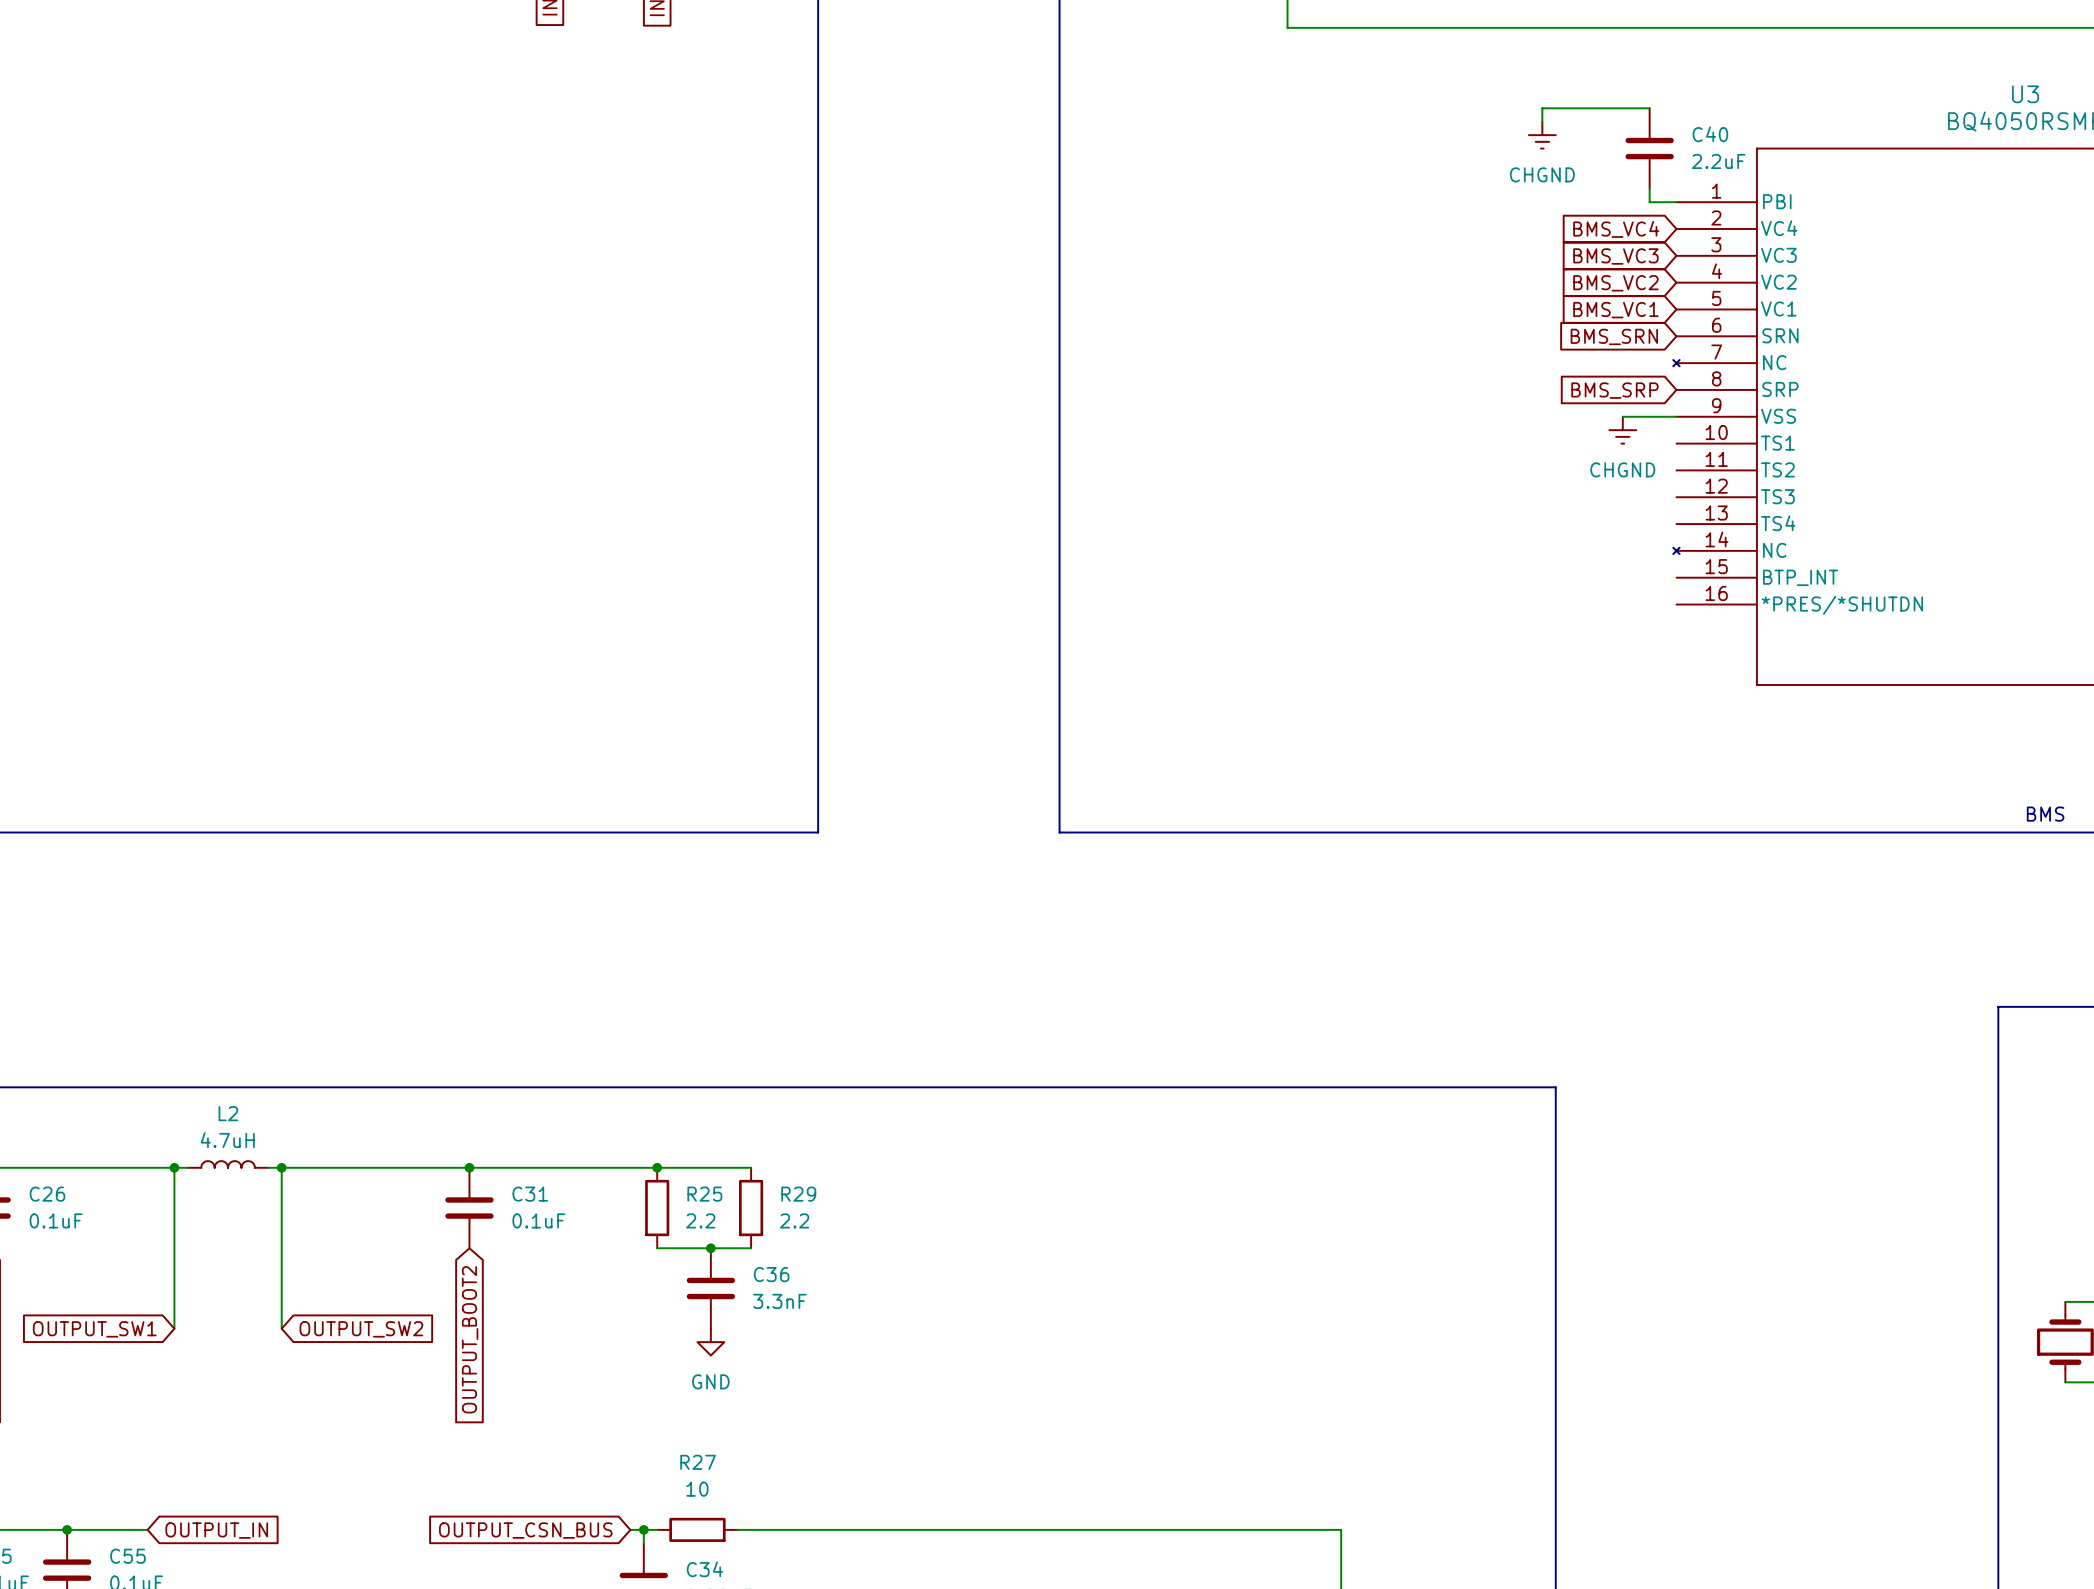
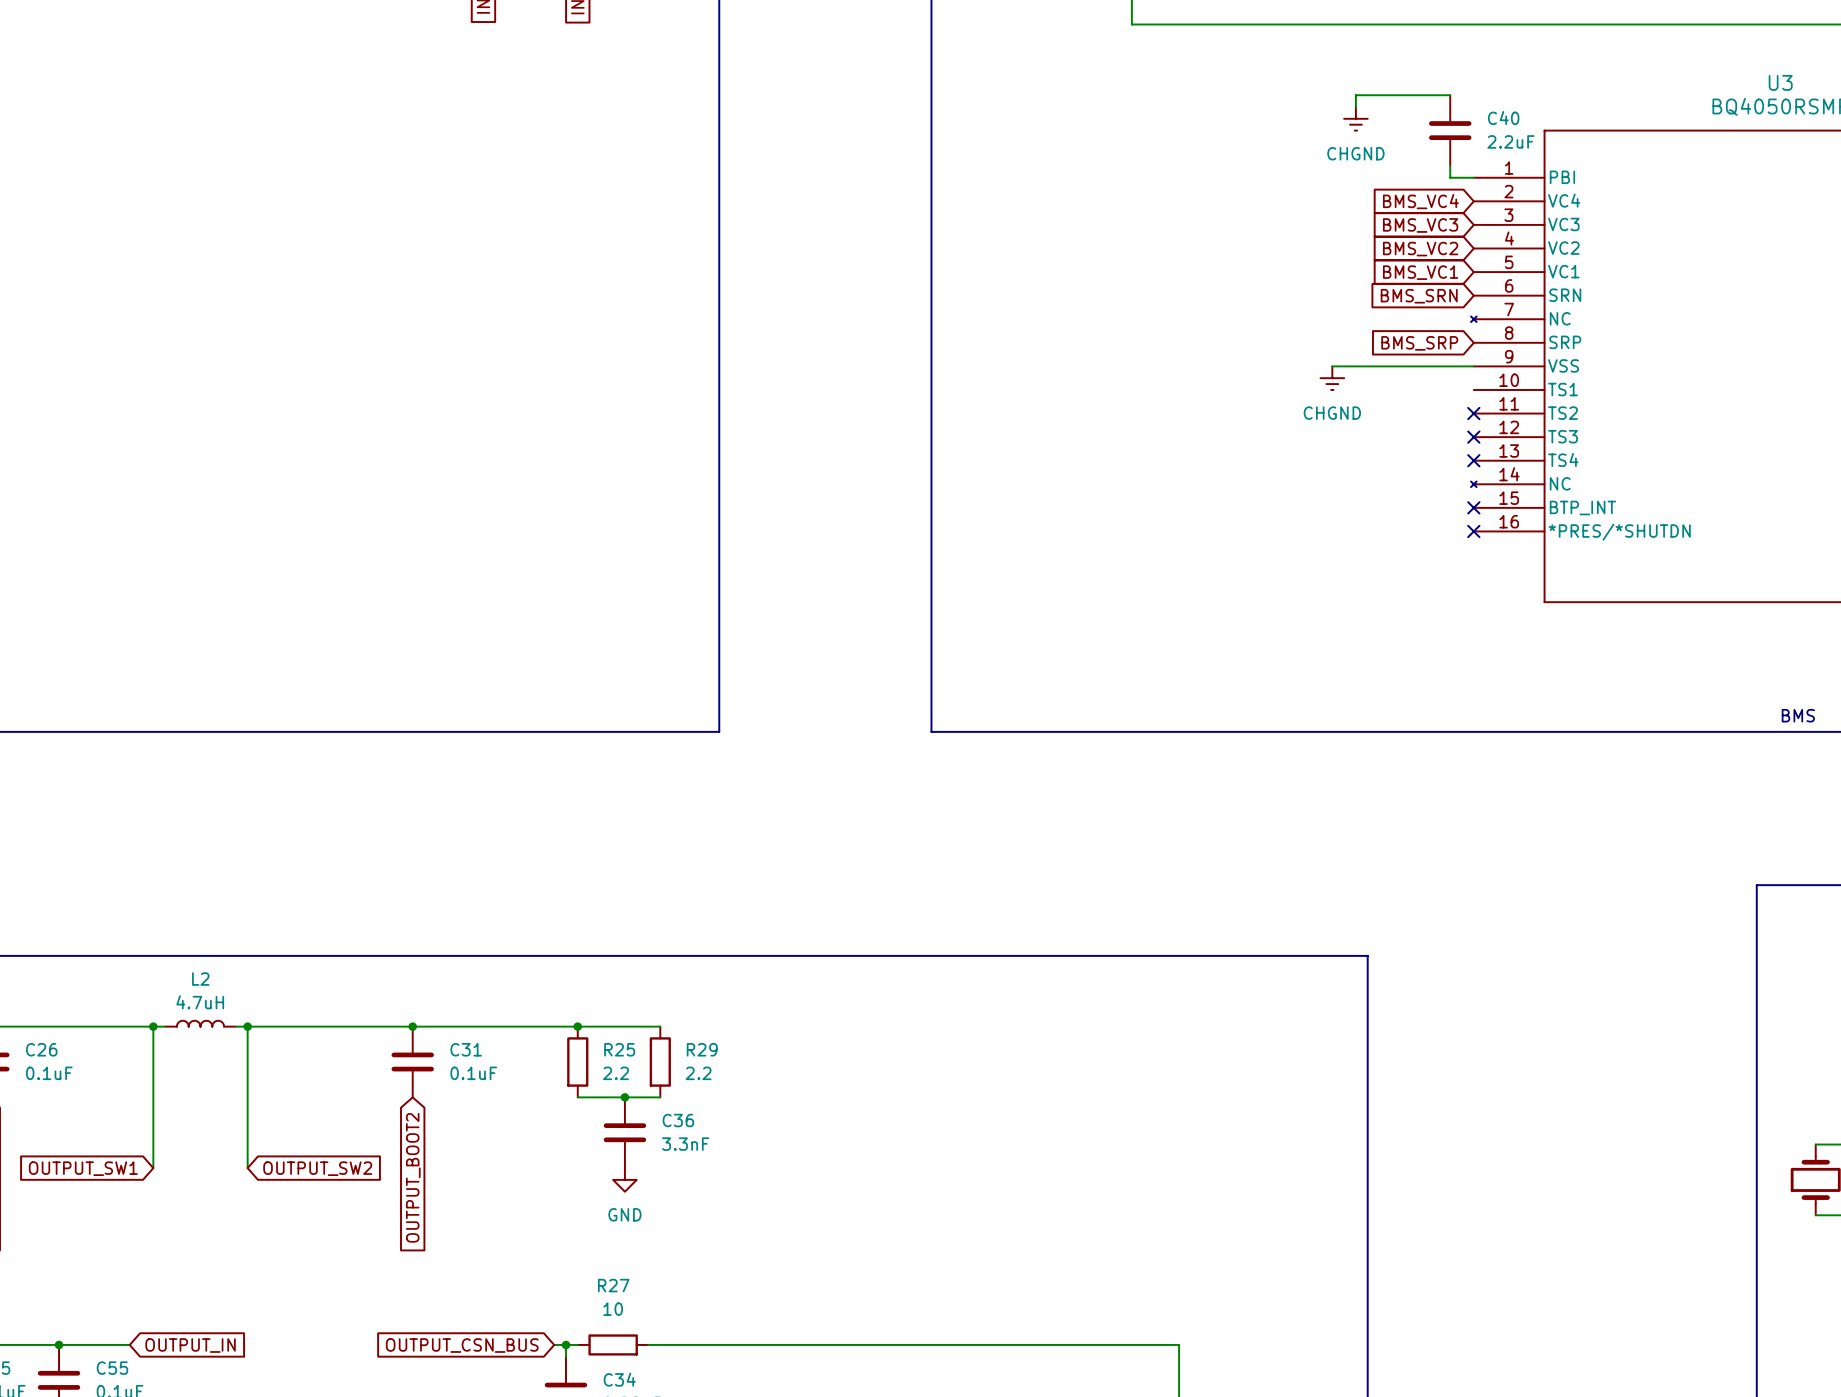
wire: none -> (1332, 366) (1426, 366)
power symbol position: CHGND (1622, 430) -> CHGND (1332, 378)
no-connect mark: none -> (1473, 413)
no-connect mark: none -> (1473, 437)
no-connect mark: none -> (1473, 460)
no-connect mark: none -> (1473, 507)
no-connect mark: none -> (1473, 531)

